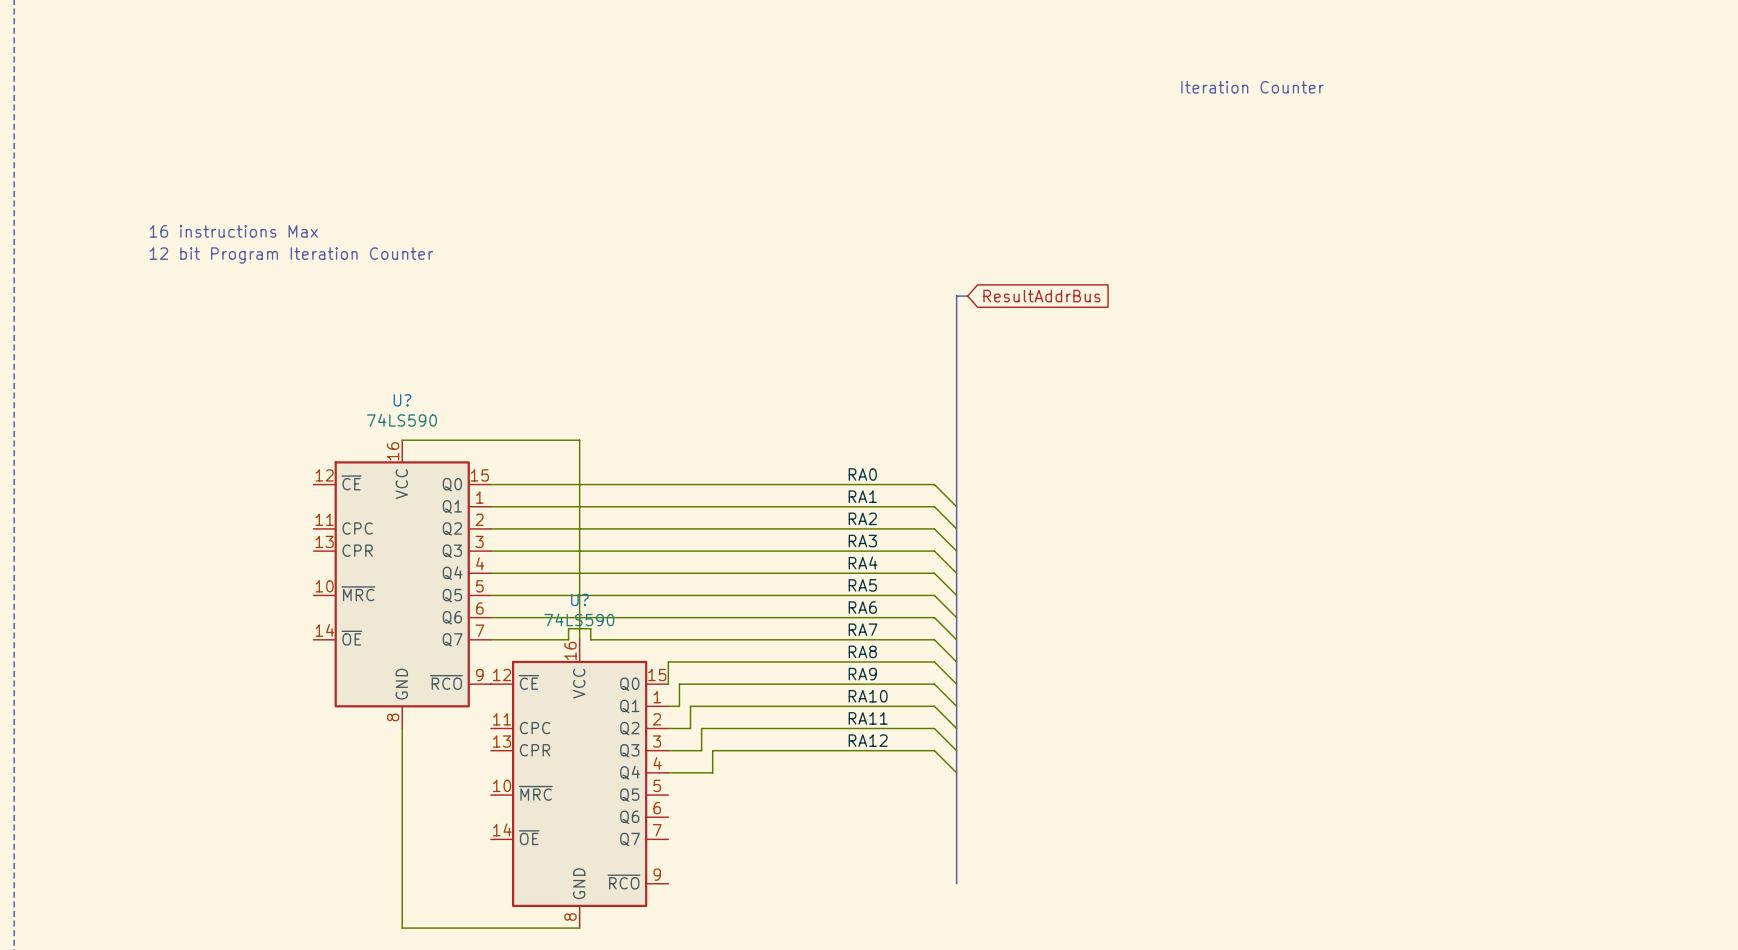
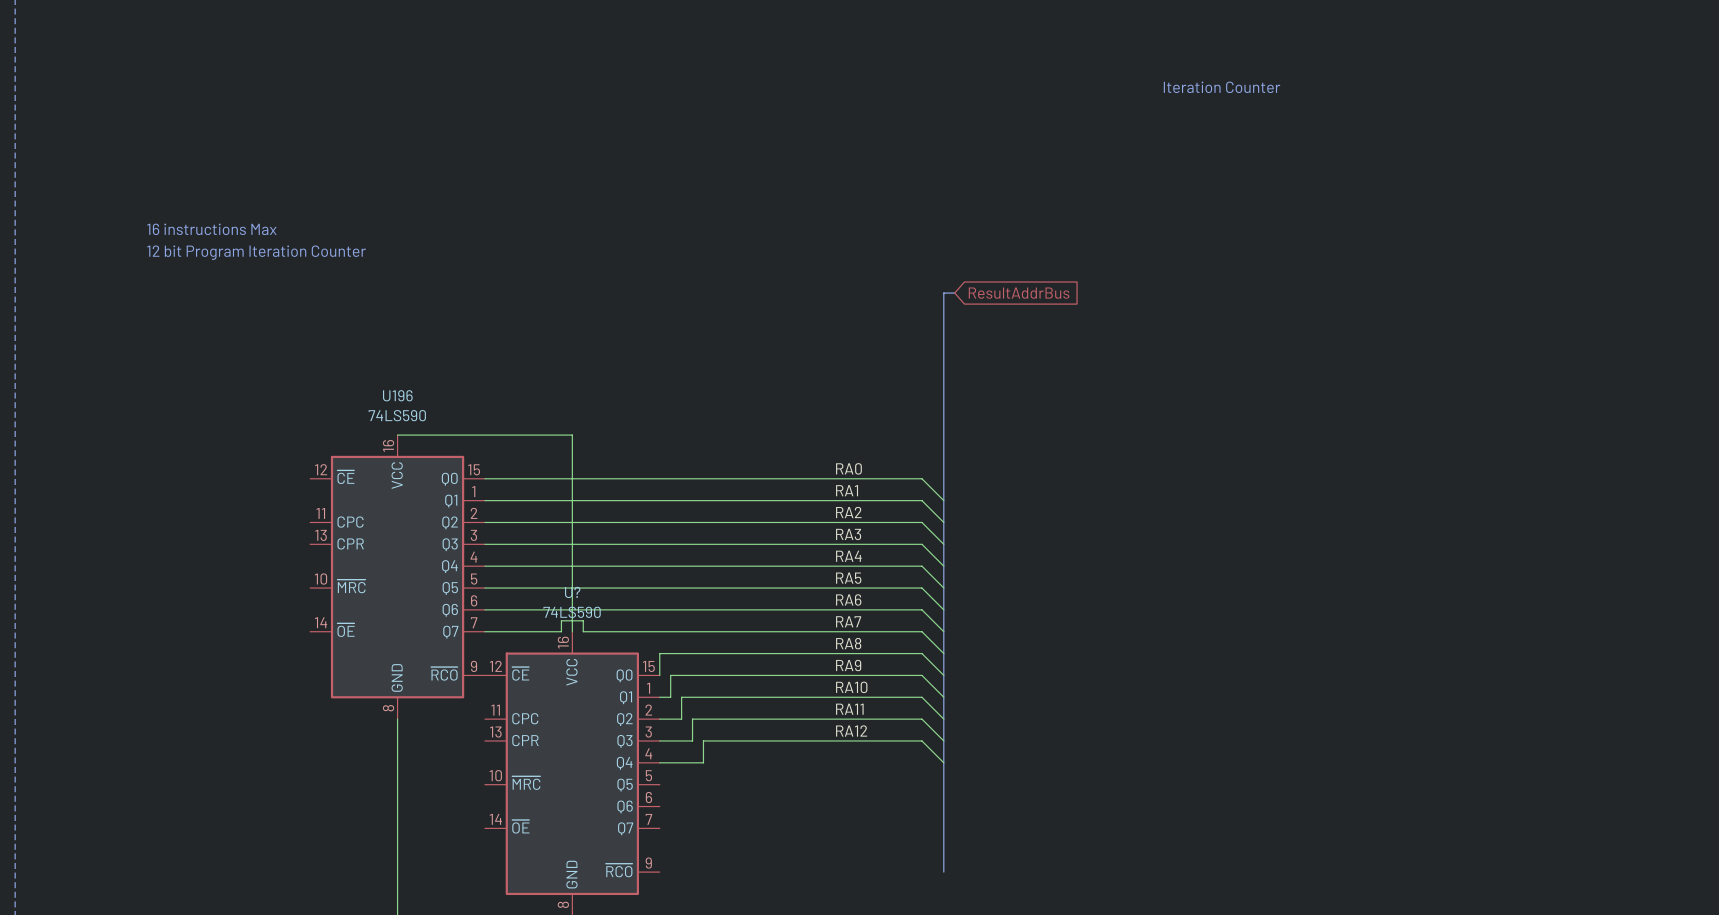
U? name: U? (402, 400) -> U196 (397, 395)

